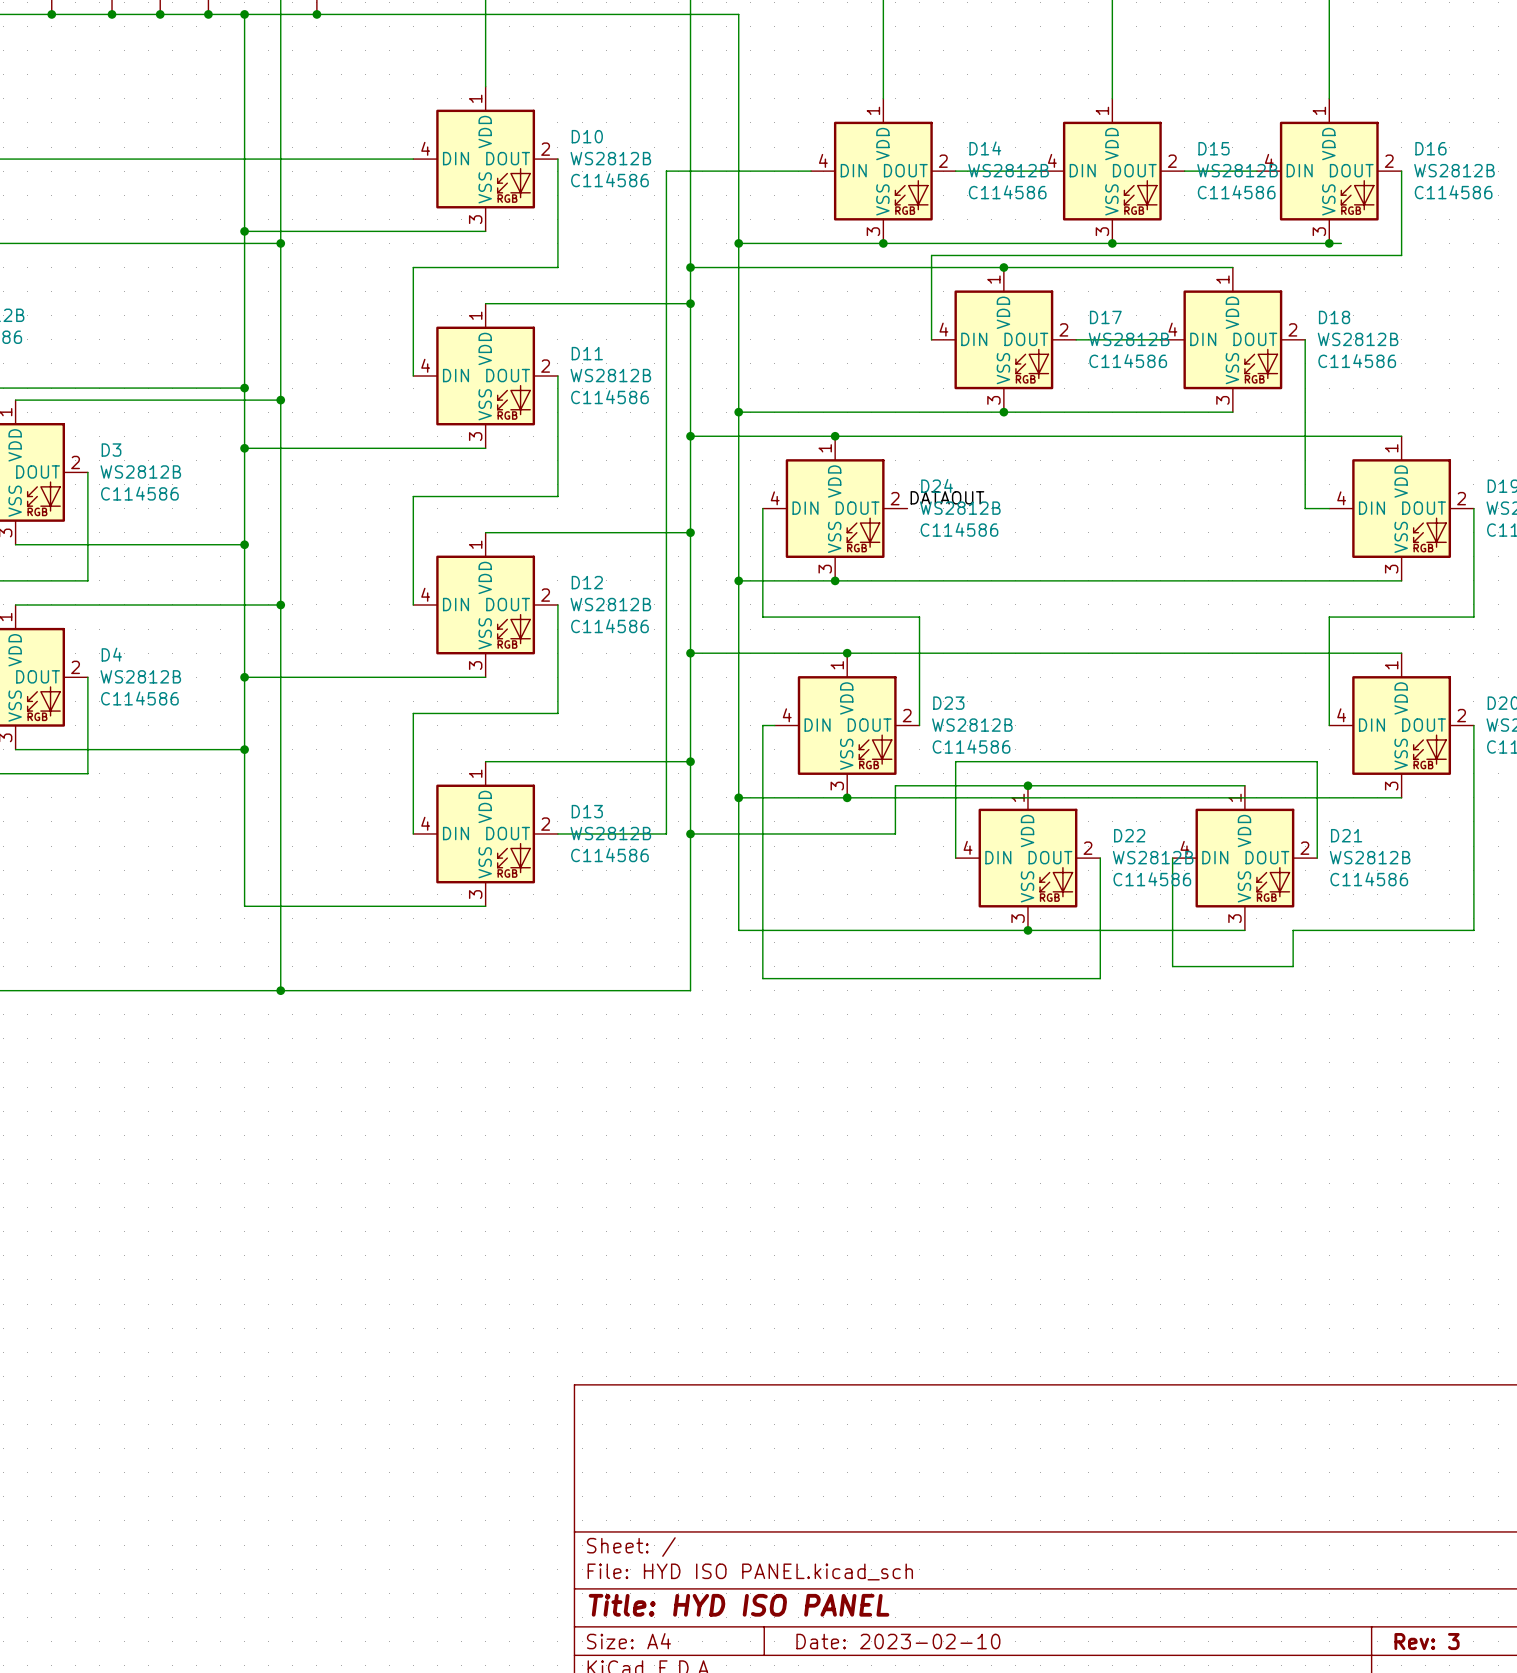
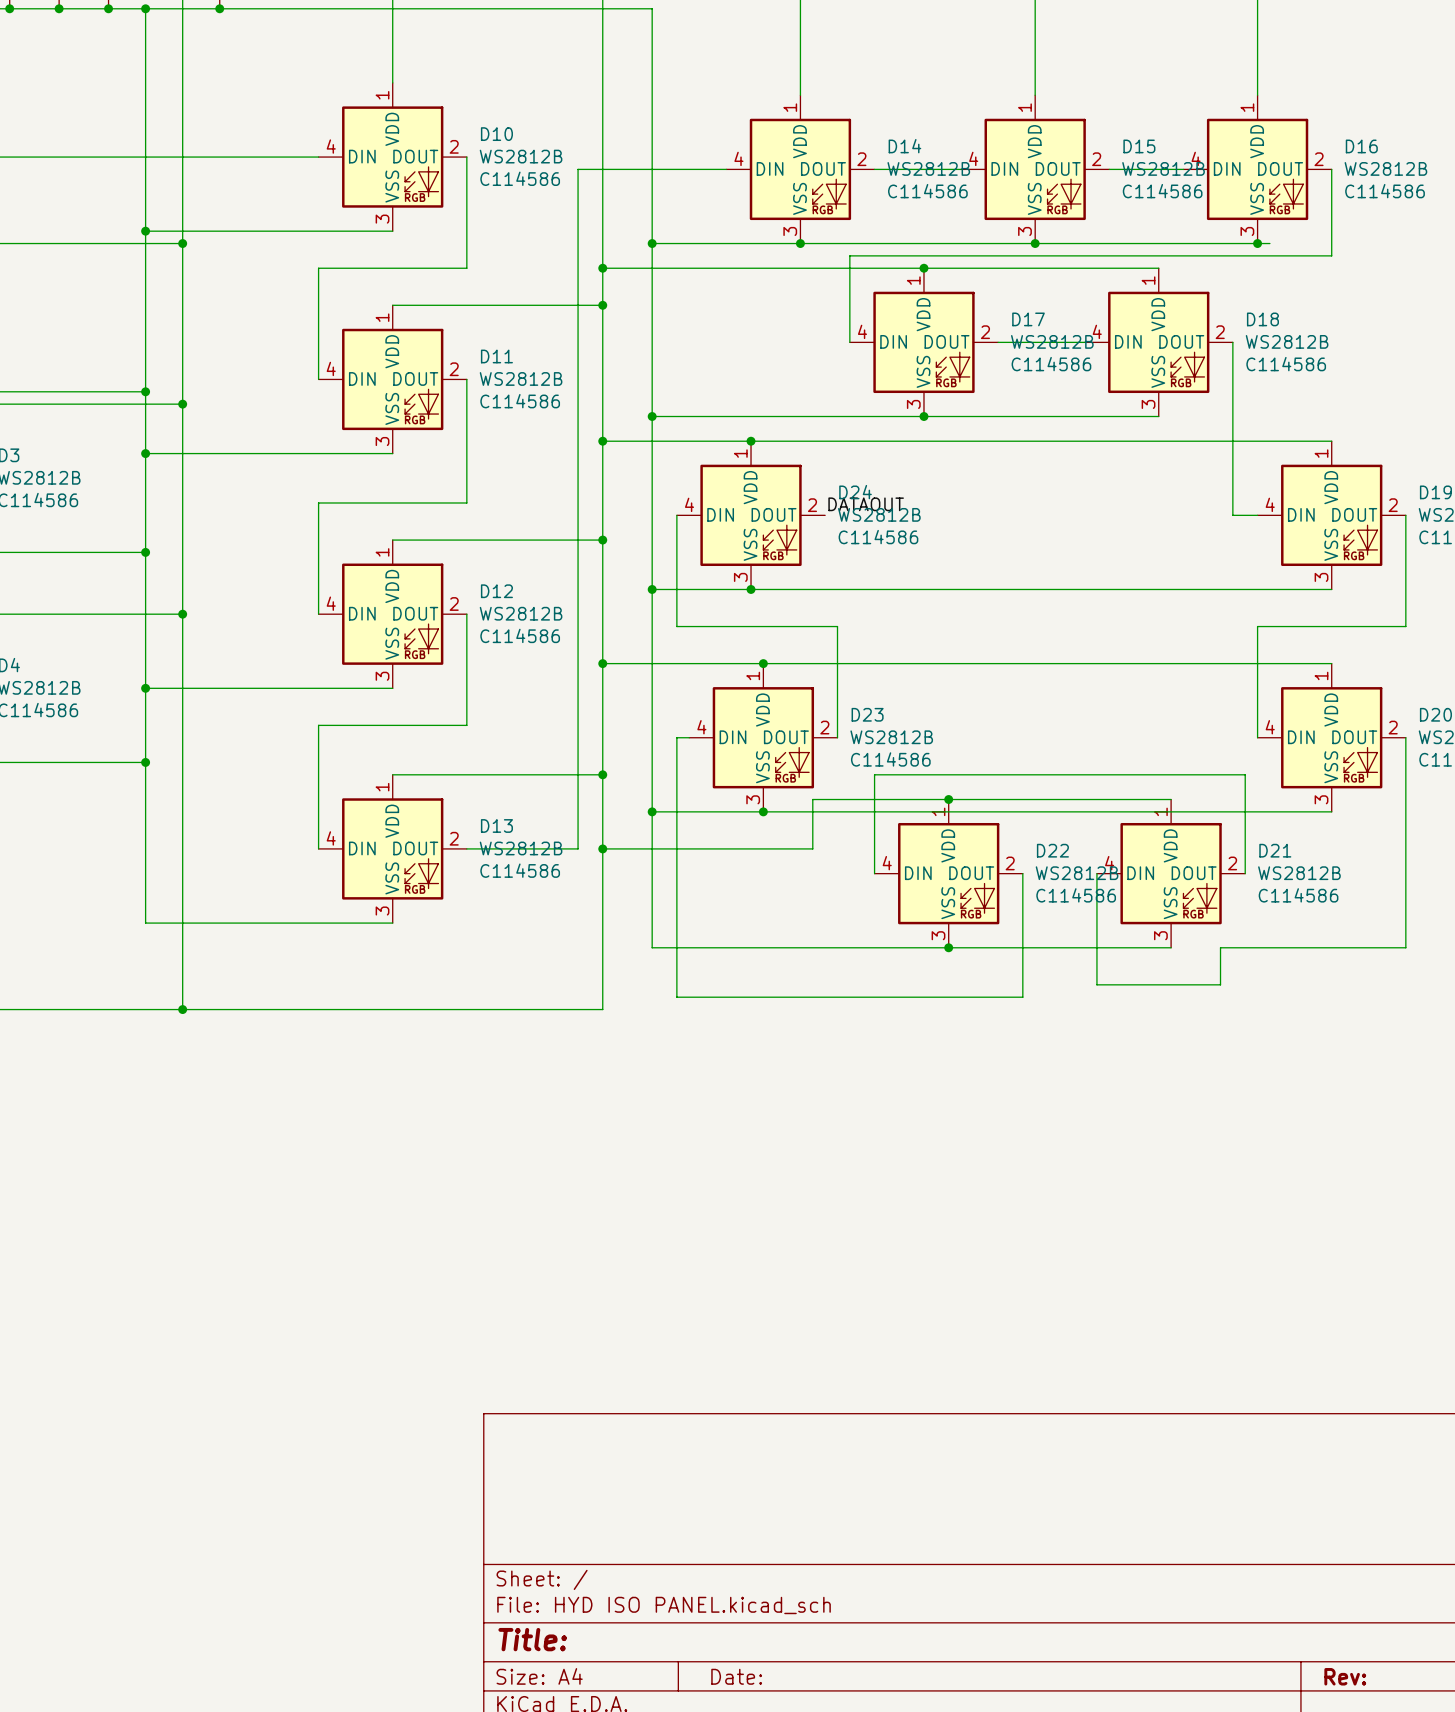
title block: Title: HYD ISO PANEL (739, 1605) -> Title: (532, 1639)
title block: Date: 2023-02-10 (898, 1641) -> Date: (736, 1676)
title block: Rev: 3 (1427, 1641) -> Rev: (1345, 1676)

